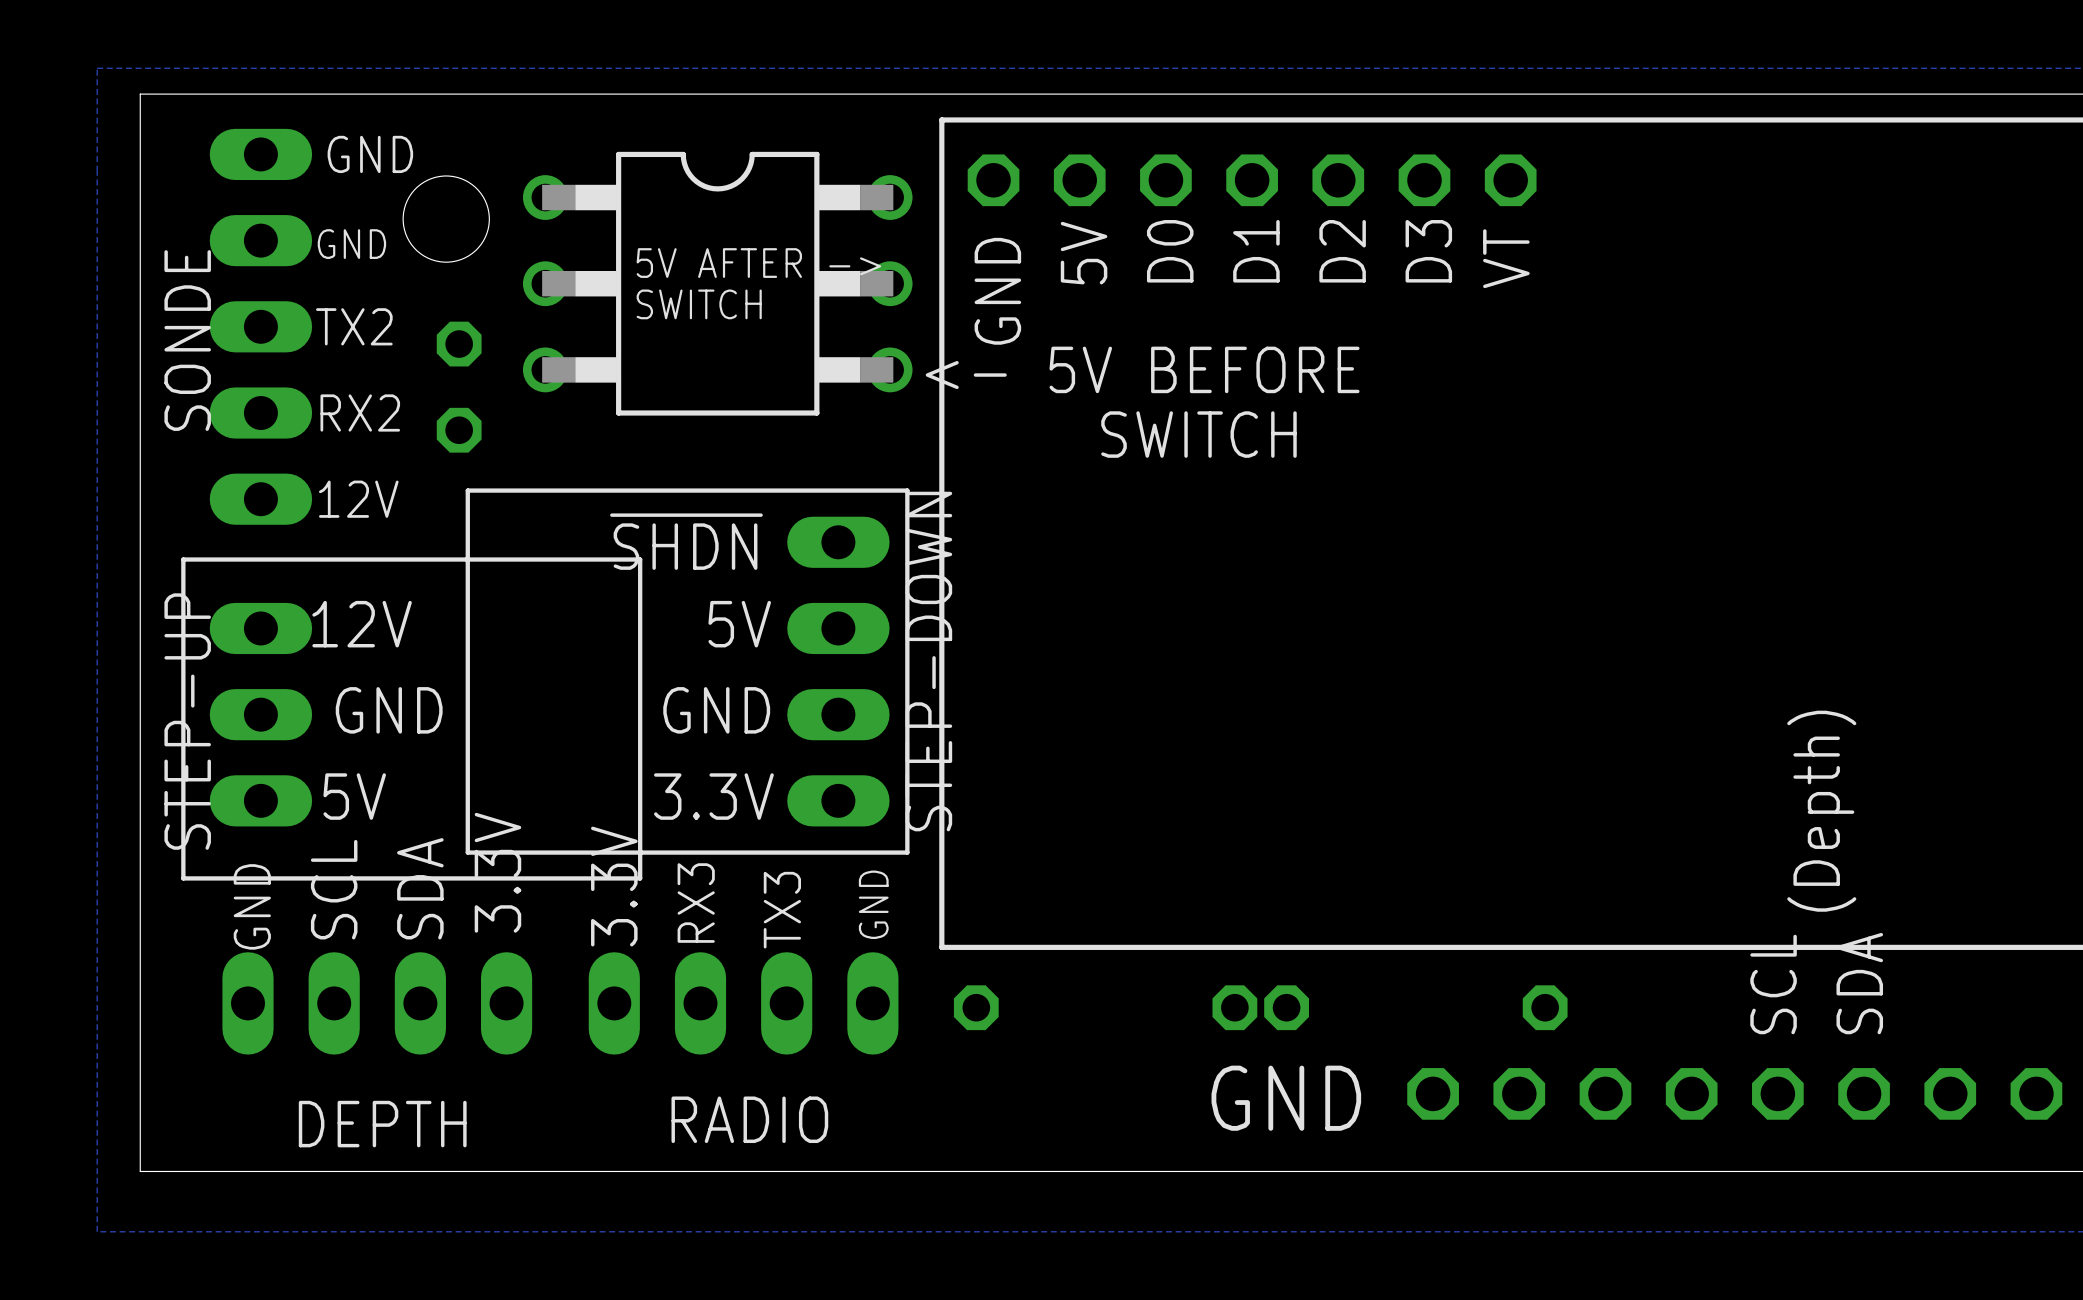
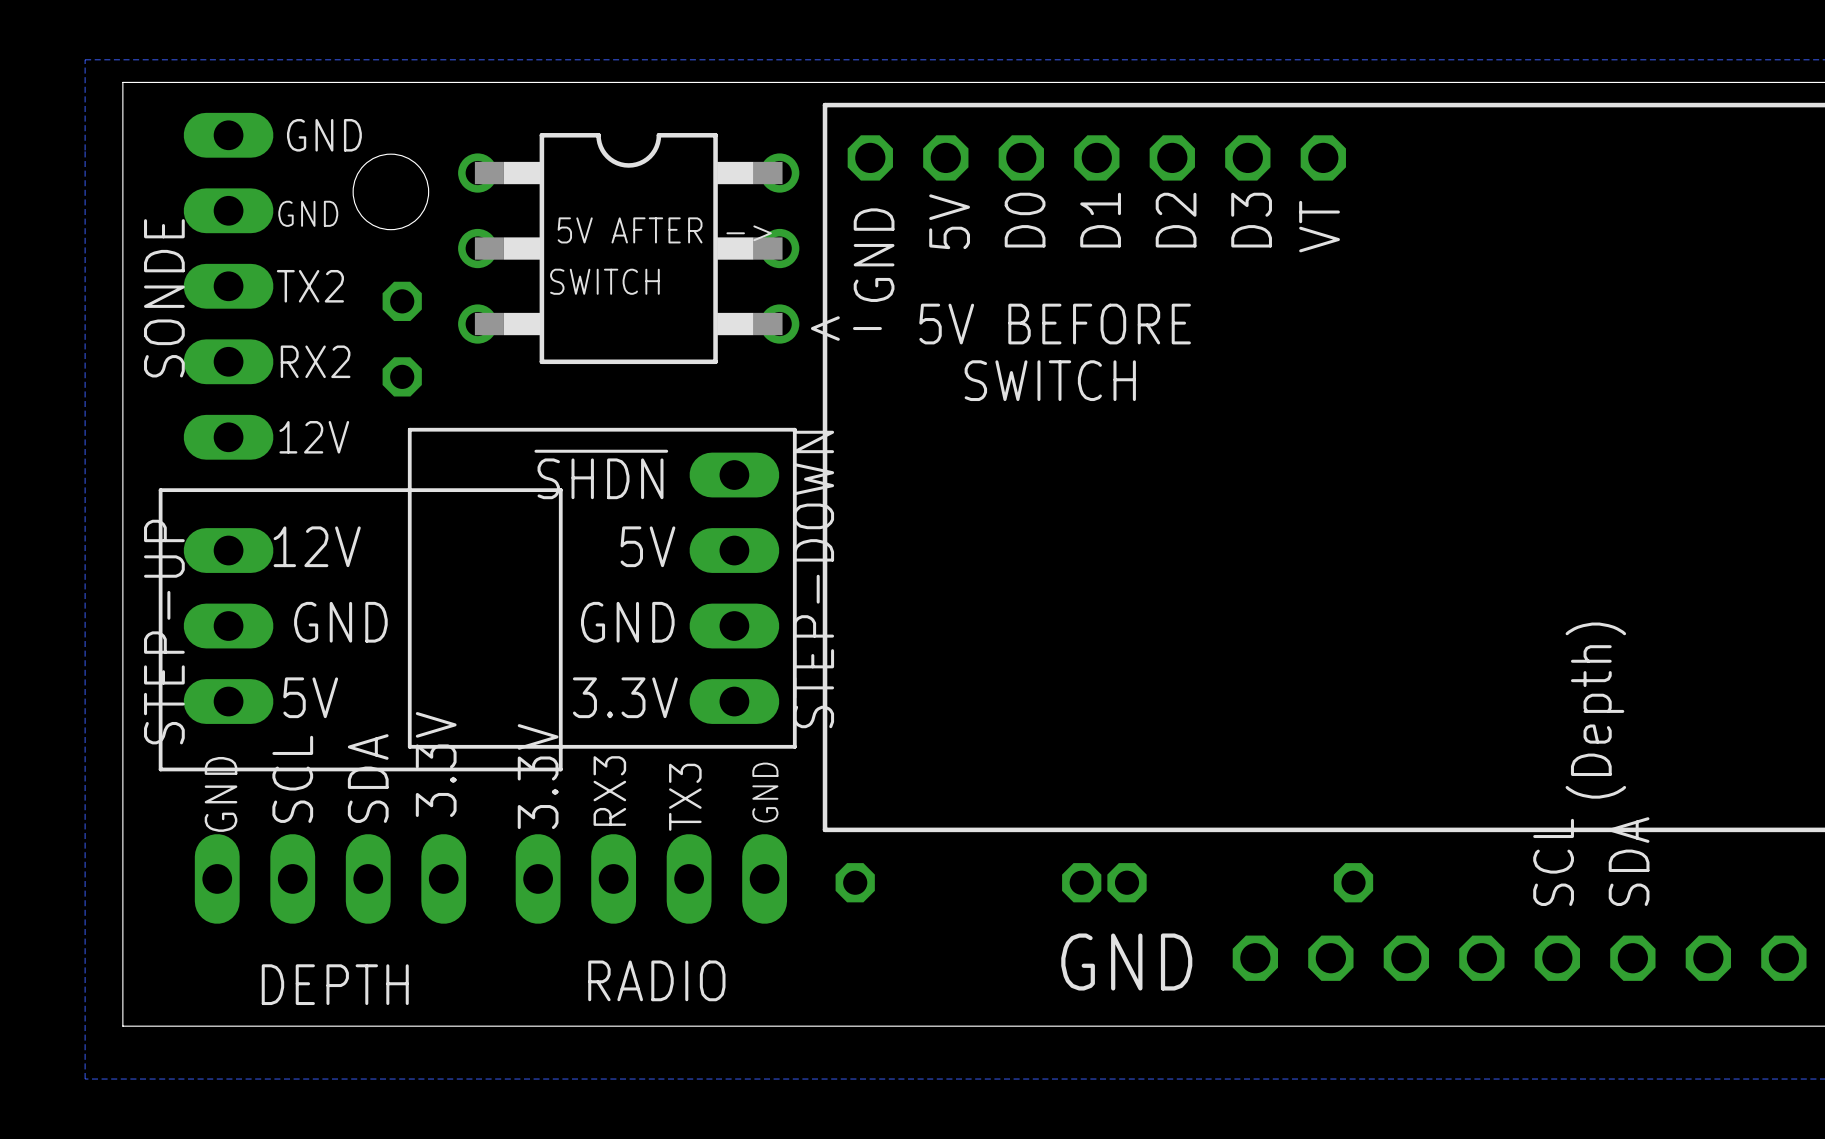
text position: SWITCH (699, 304) -> SWITCH (604, 281)

